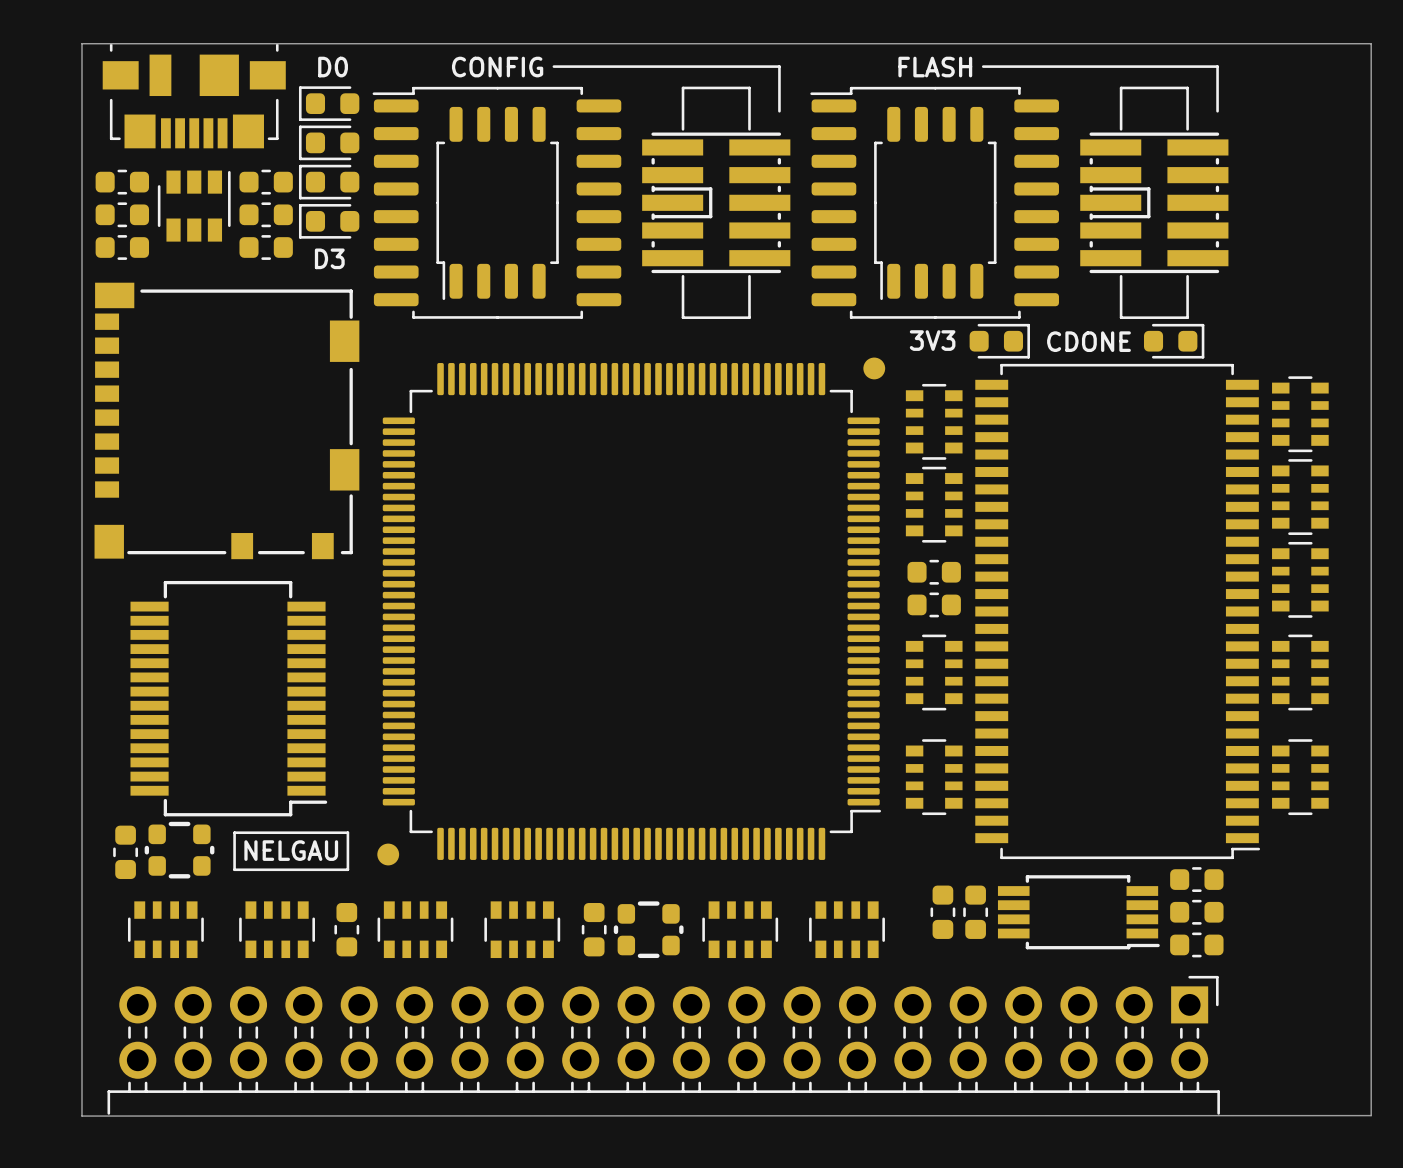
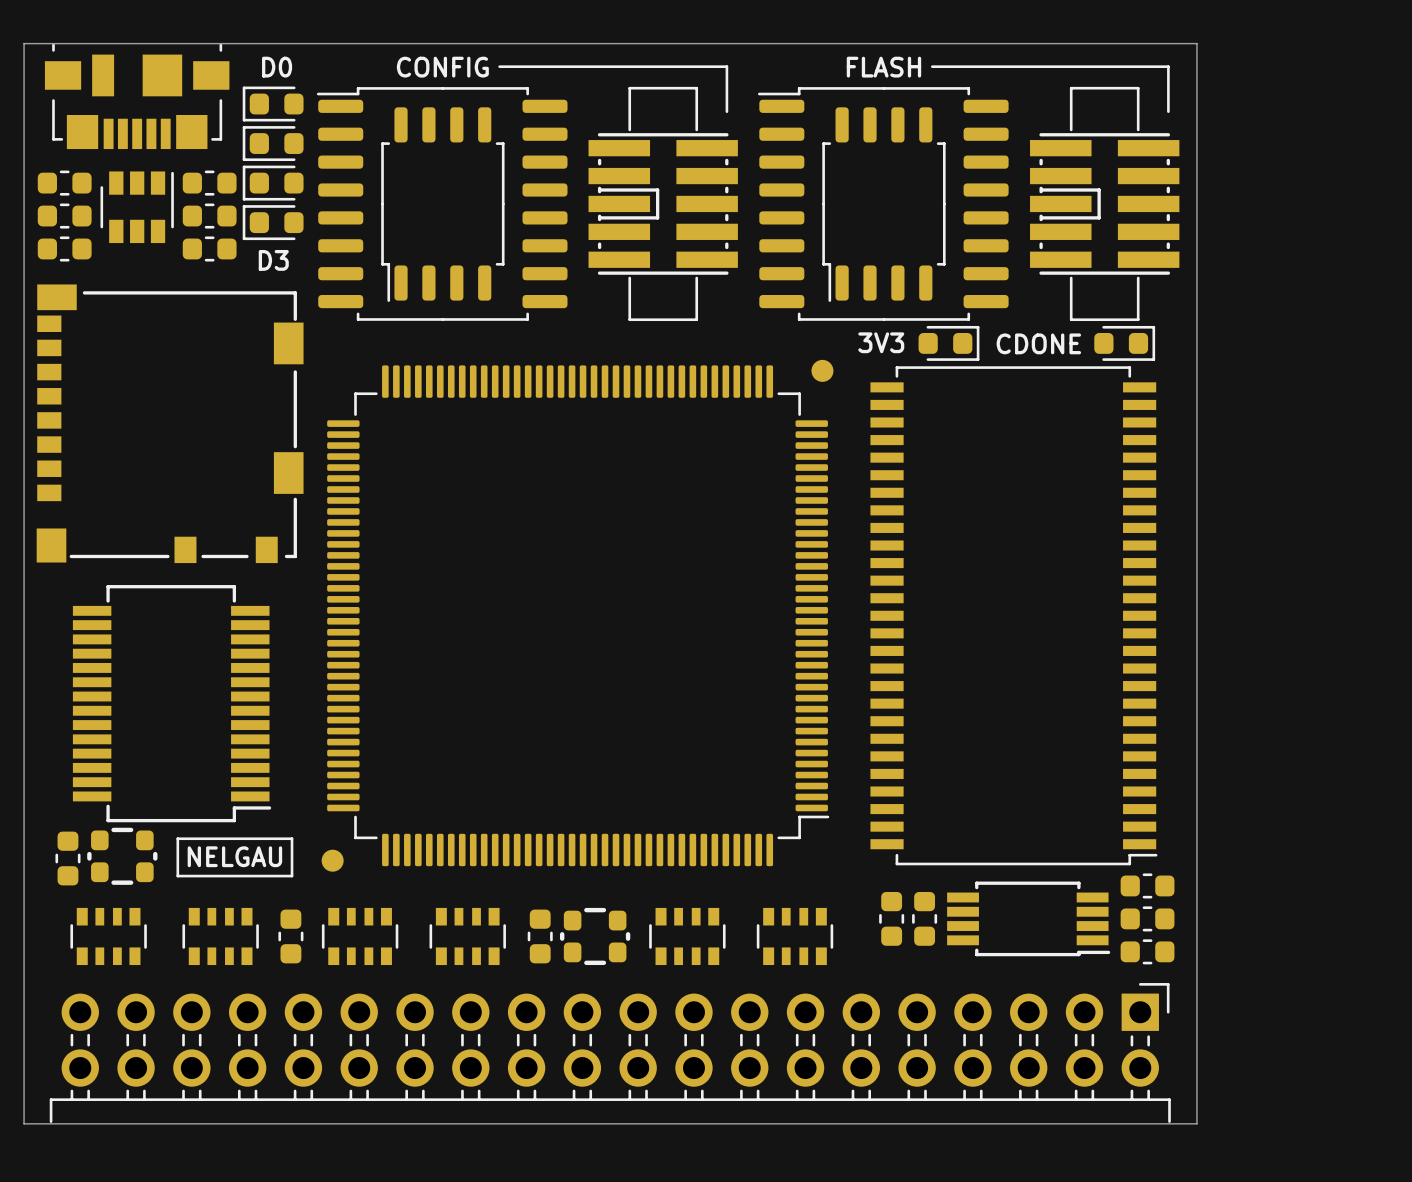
board edge: (1245, 43) (1371, 43) (1371, 1115) (82, 1115) -> (1196, 43) (1196, 1123) (24, 1123)
part: (1300, 414) -> none
part: (934, 421) -> none
part: (1300, 497) -> none
part: (934, 504) -> none
part: (934, 572) -> none
part: (1300, 579) -> none
part: (934, 604) -> none
part position: (1117, 611) -> (1013, 615)
part: (934, 672) -> none
part: (1300, 672) -> none
part: (934, 777) -> none
part: (1300, 777) -> none

